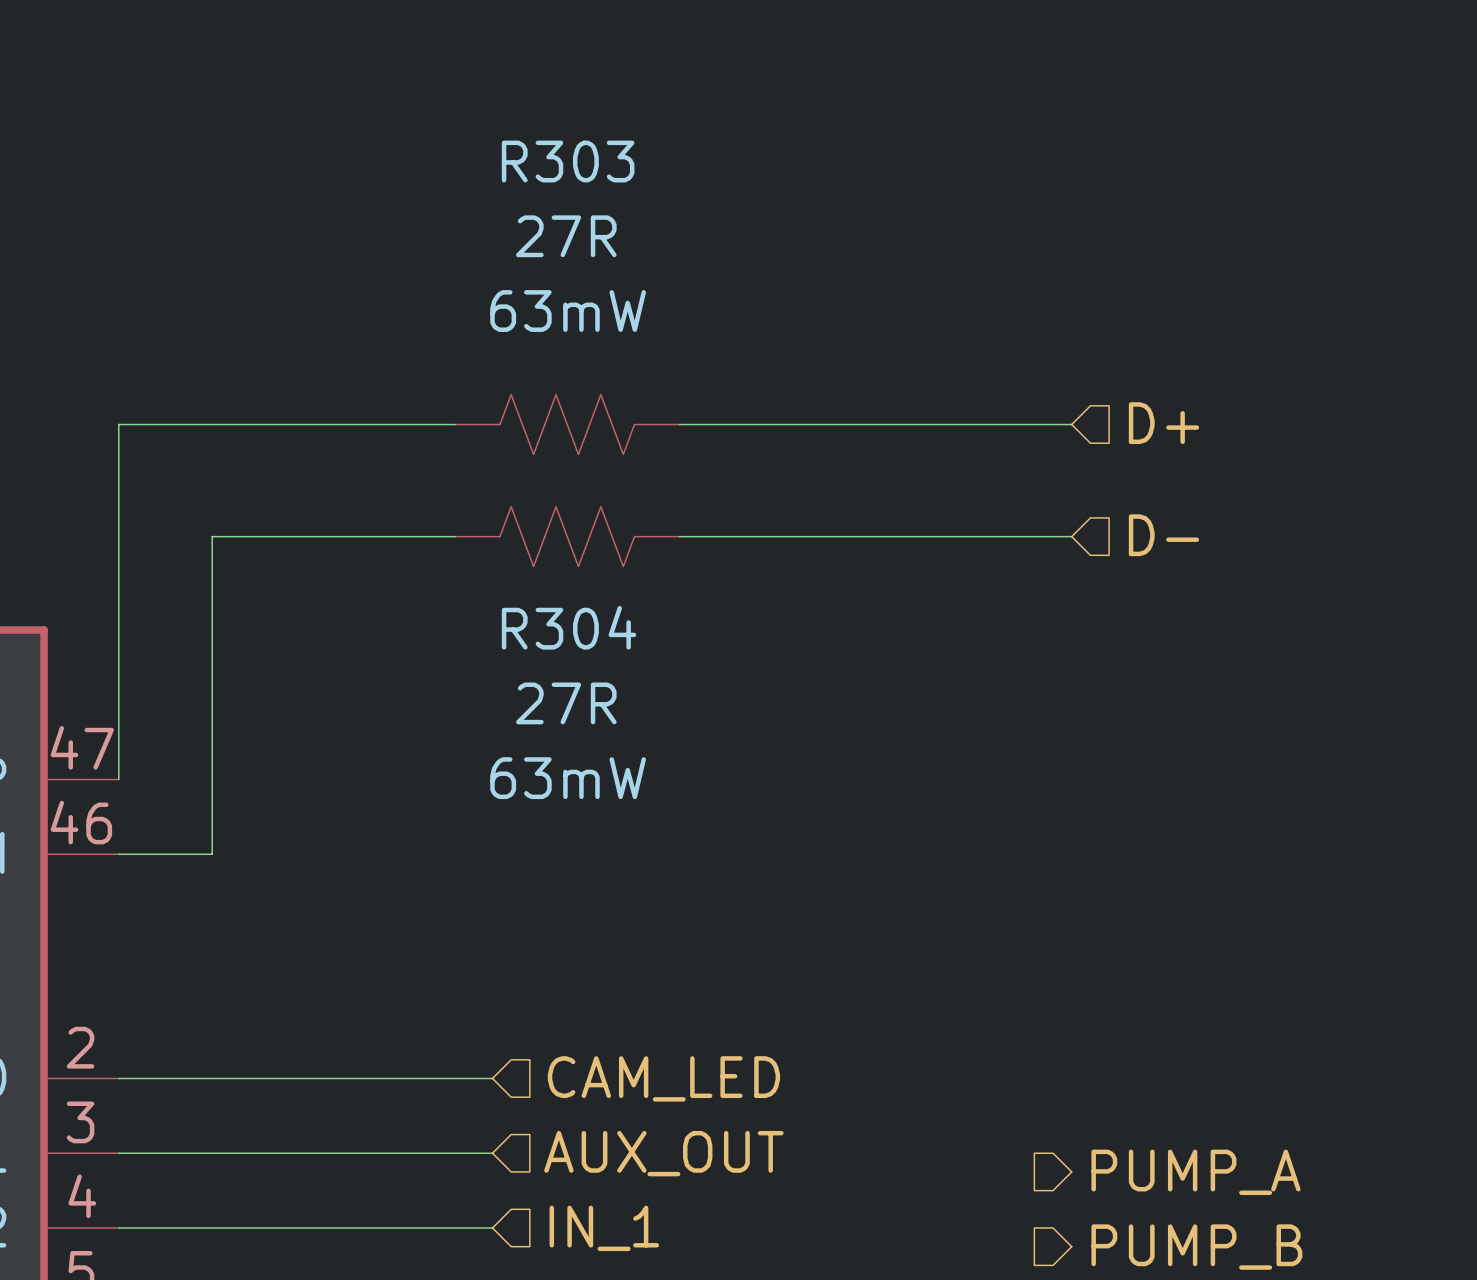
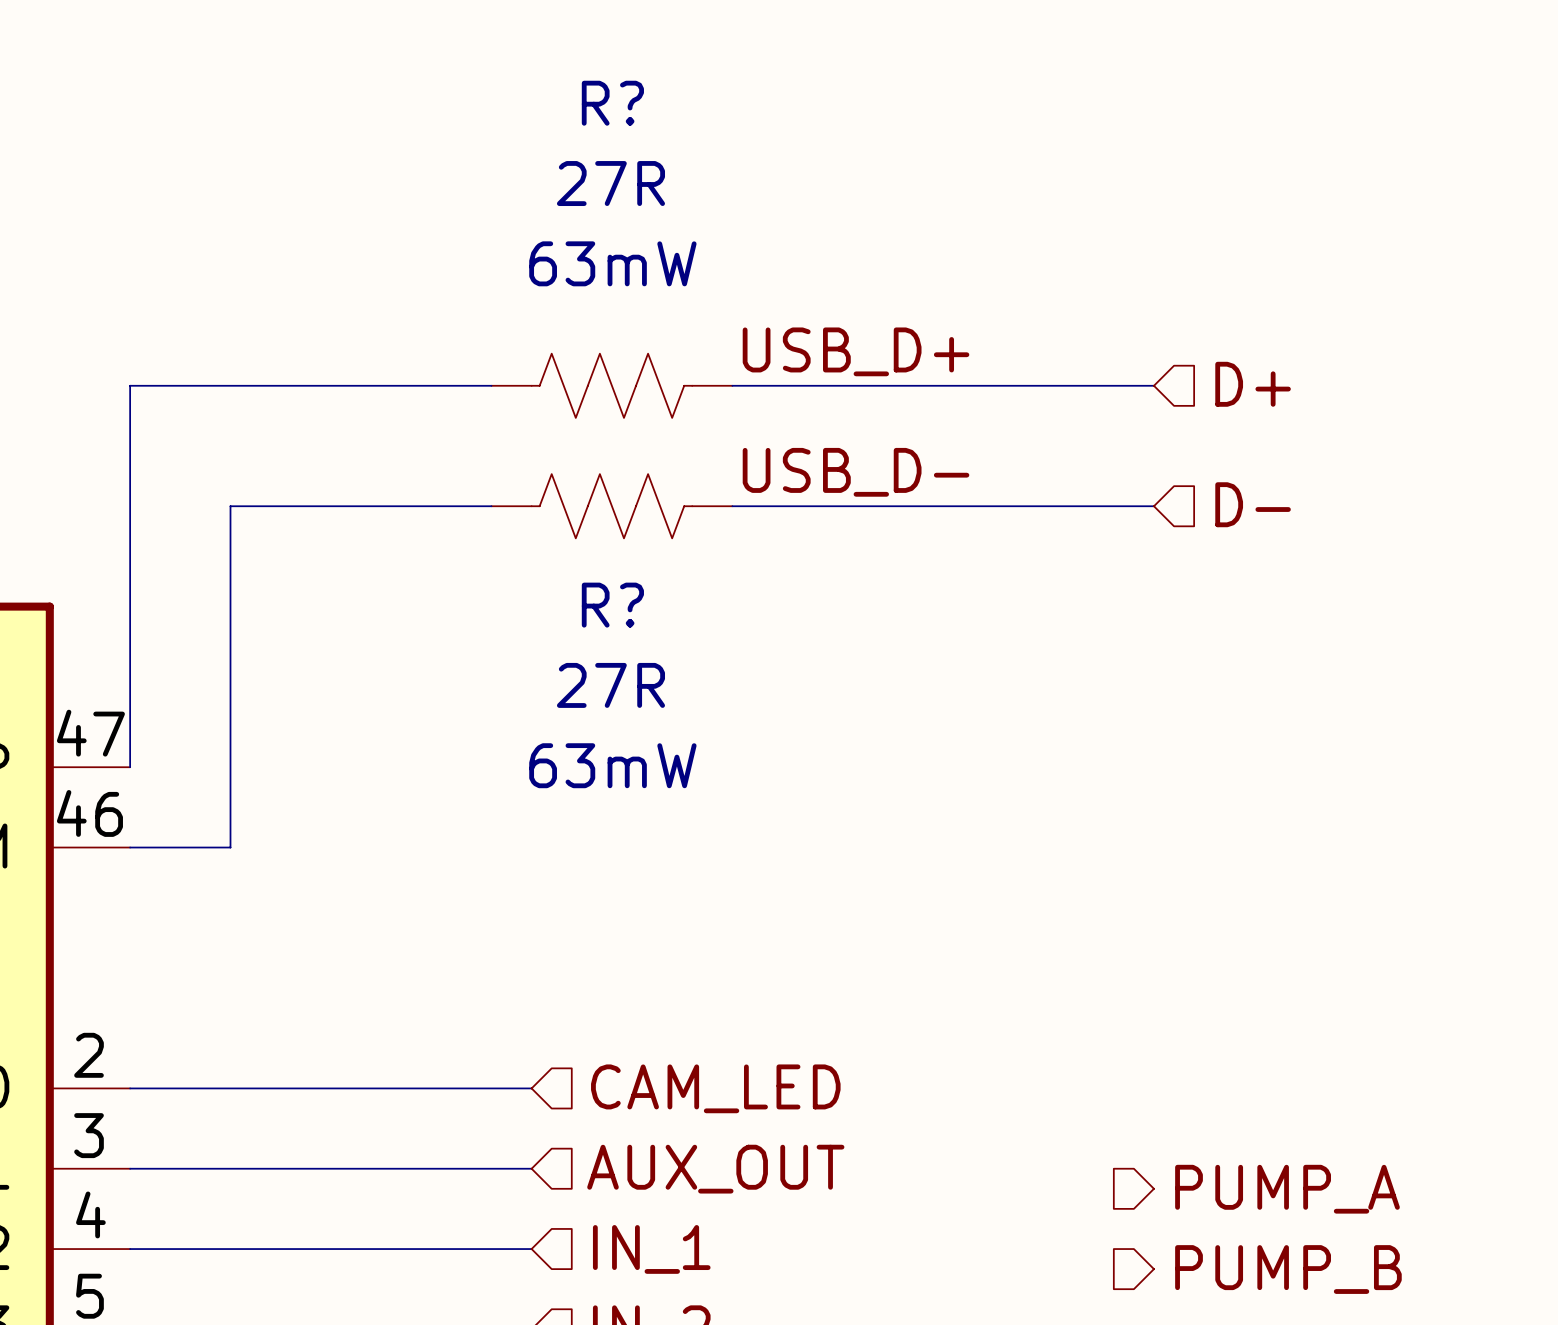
R303 name: R303 (568, 161) -> R? (612, 103)
label: none -> USB_D+ (856, 351)
label: none -> USB_D- (856, 472)
R304 name: R304 (569, 627) -> R? (612, 605)

